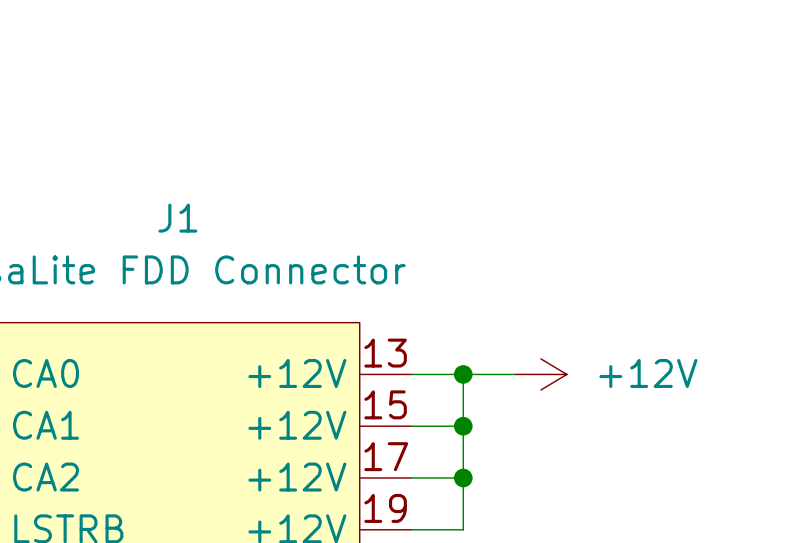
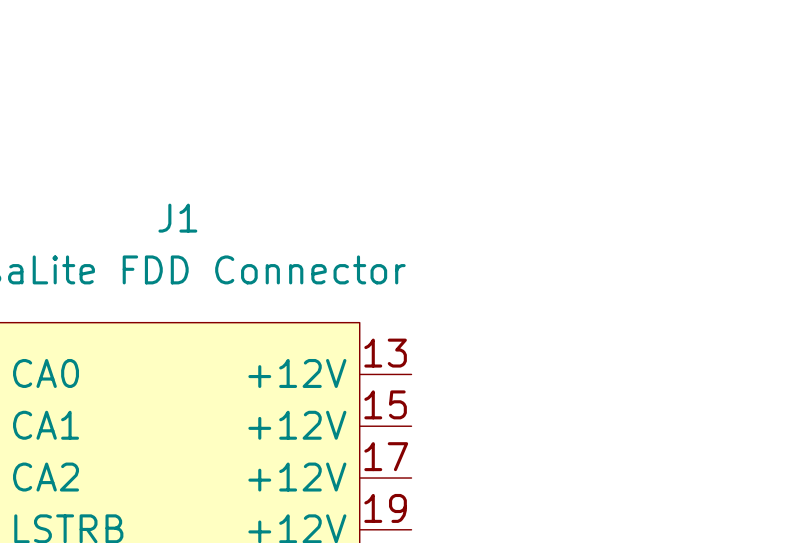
wire: (411, 374) (515, 374) -> none
wire: (463, 374) (463, 529) (411, 529) -> none
junction: (463, 374) -> none
power symbol: +12V (540, 374) -> none
wire: (411, 426) (463, 426) -> none
junction: (463, 426) -> none
wire: (411, 478) (463, 478) -> none
junction: (463, 478) -> none

